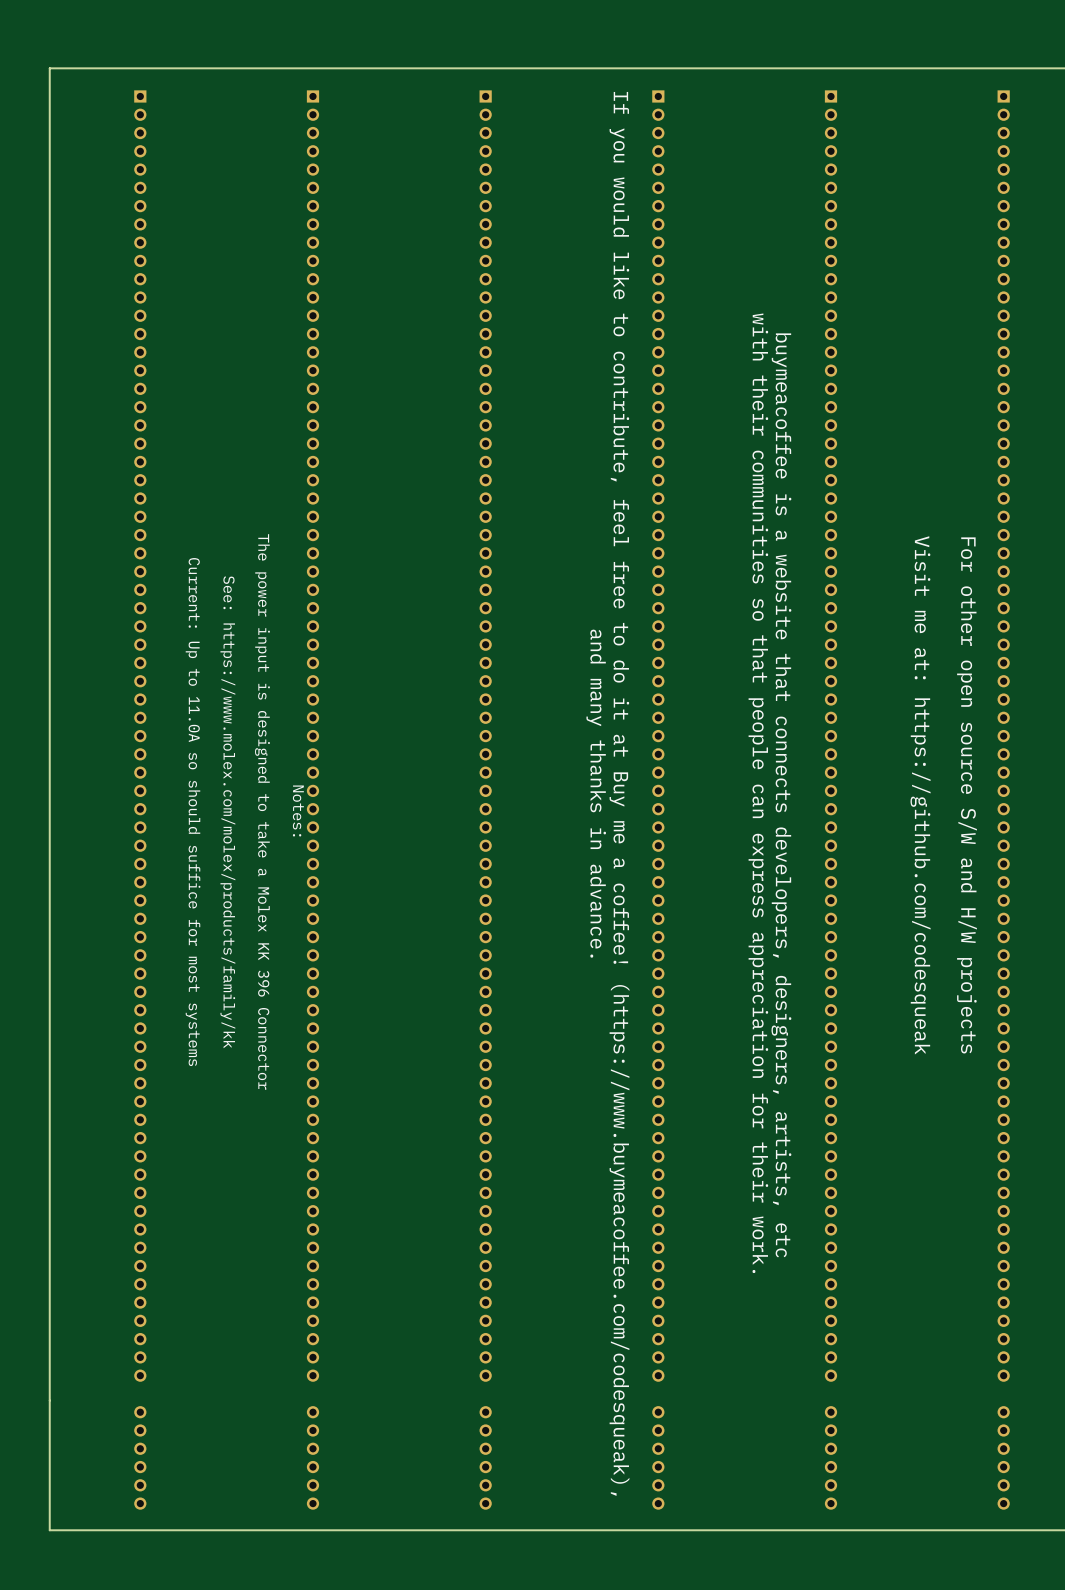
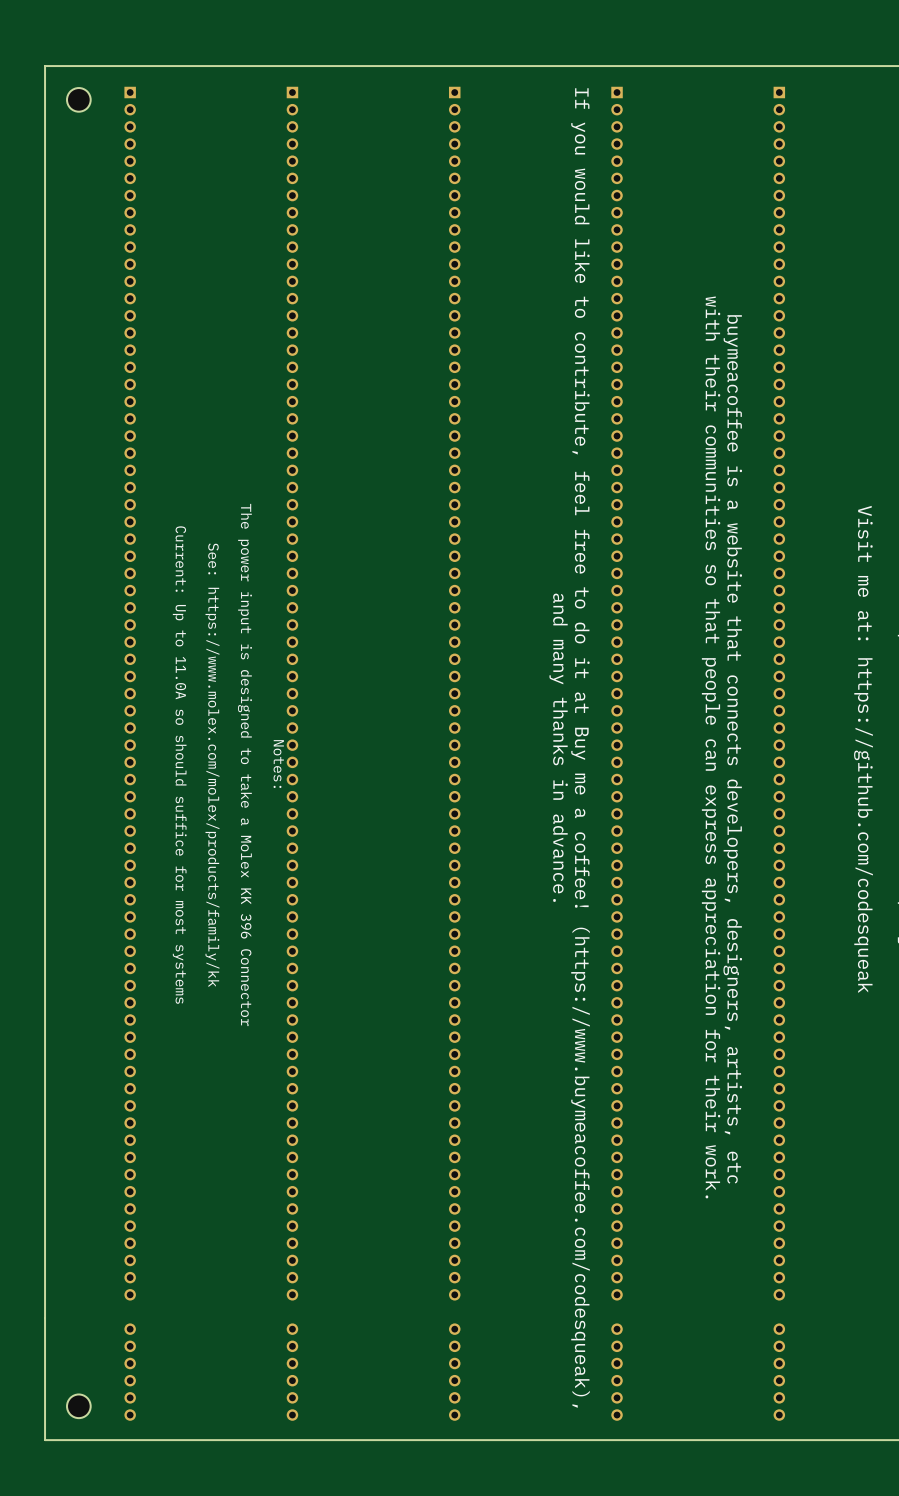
part: none -> (78, 99)
part: none -> (78, 1406)

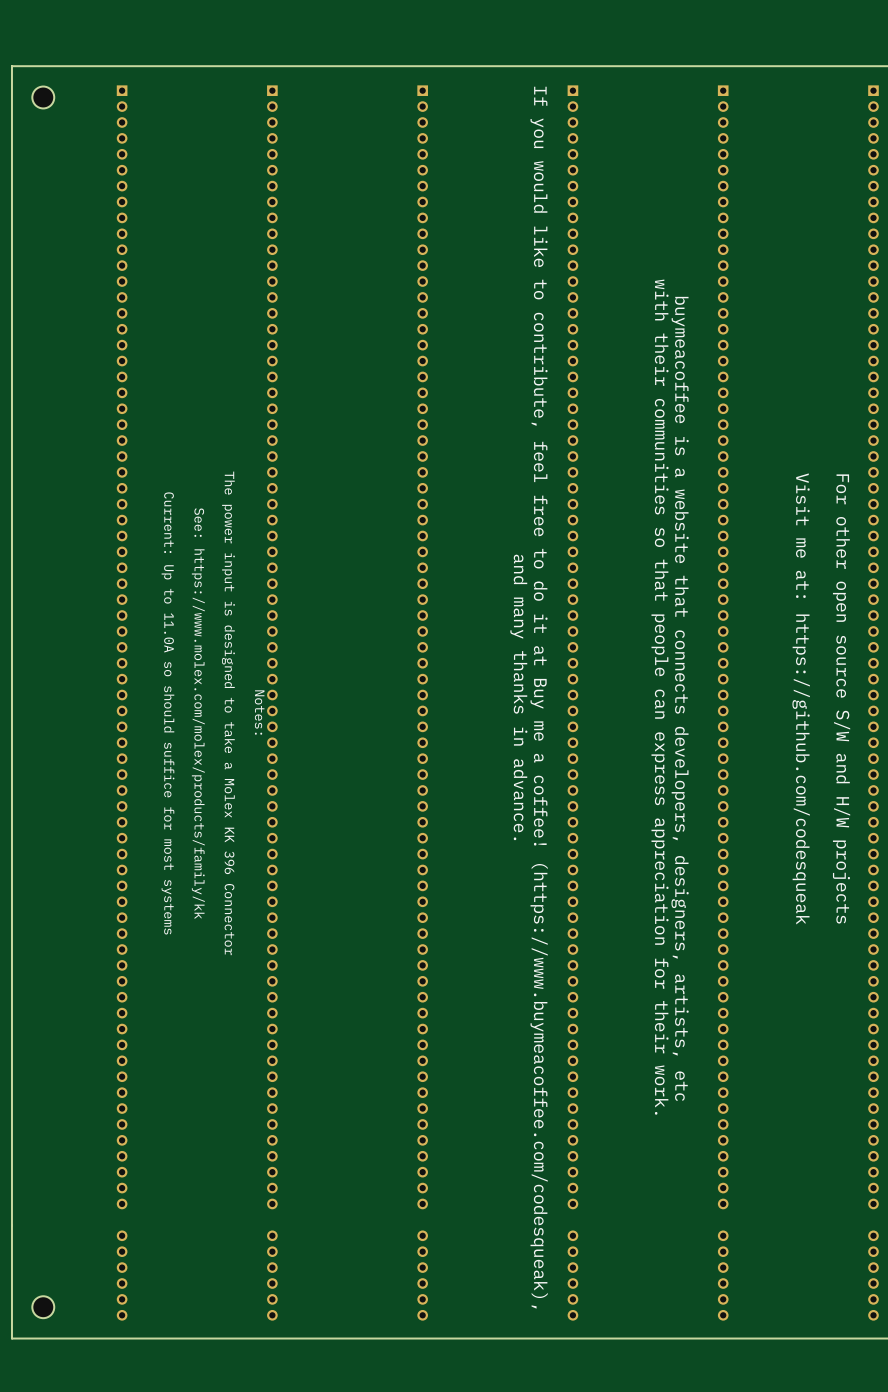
board edge: (45, 66) (45, 1440) -> (43, 66) (11, 66) (11, 1338) (43, 1338)
part position: (78, 99) -> (43, 97)
part position: (78, 1406) -> (43, 1307)

